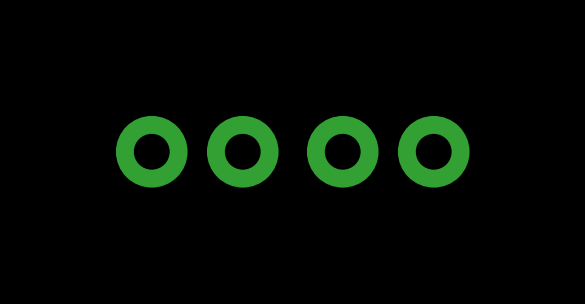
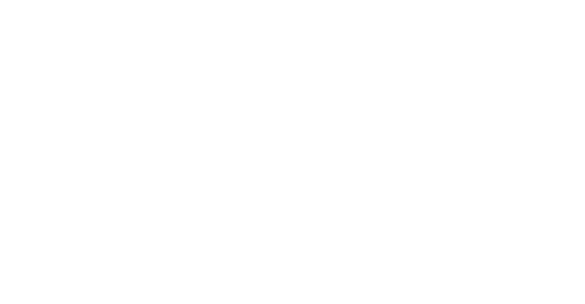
part: (197, 151) -> none
part: (388, 151) -> none

